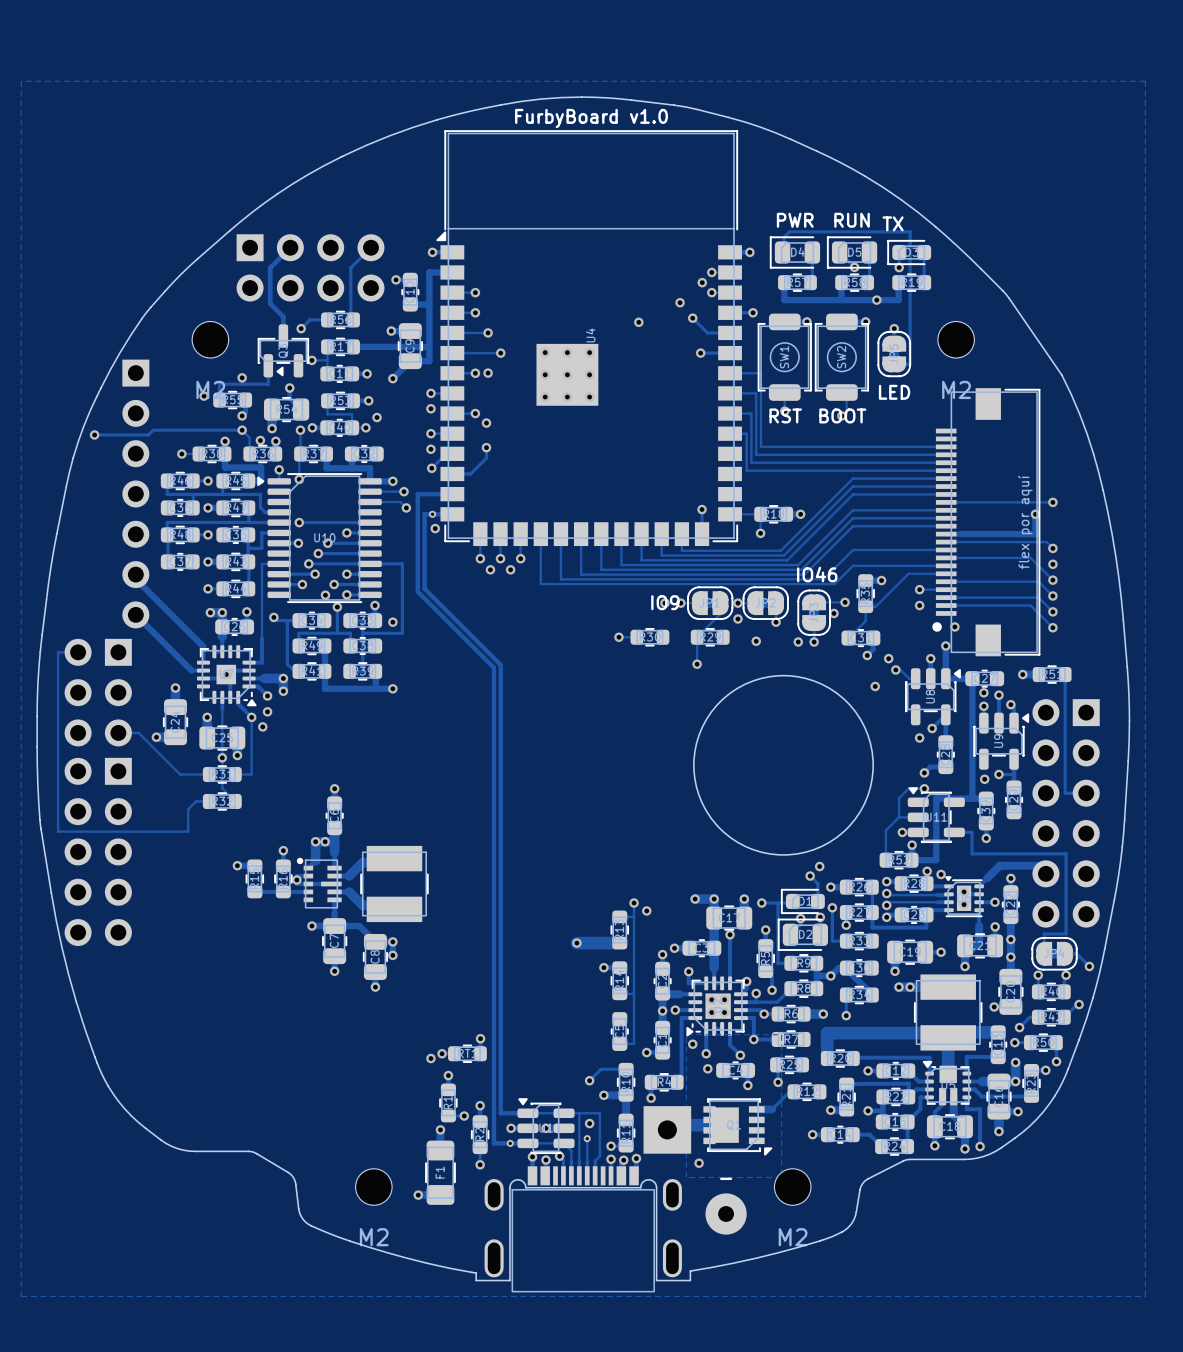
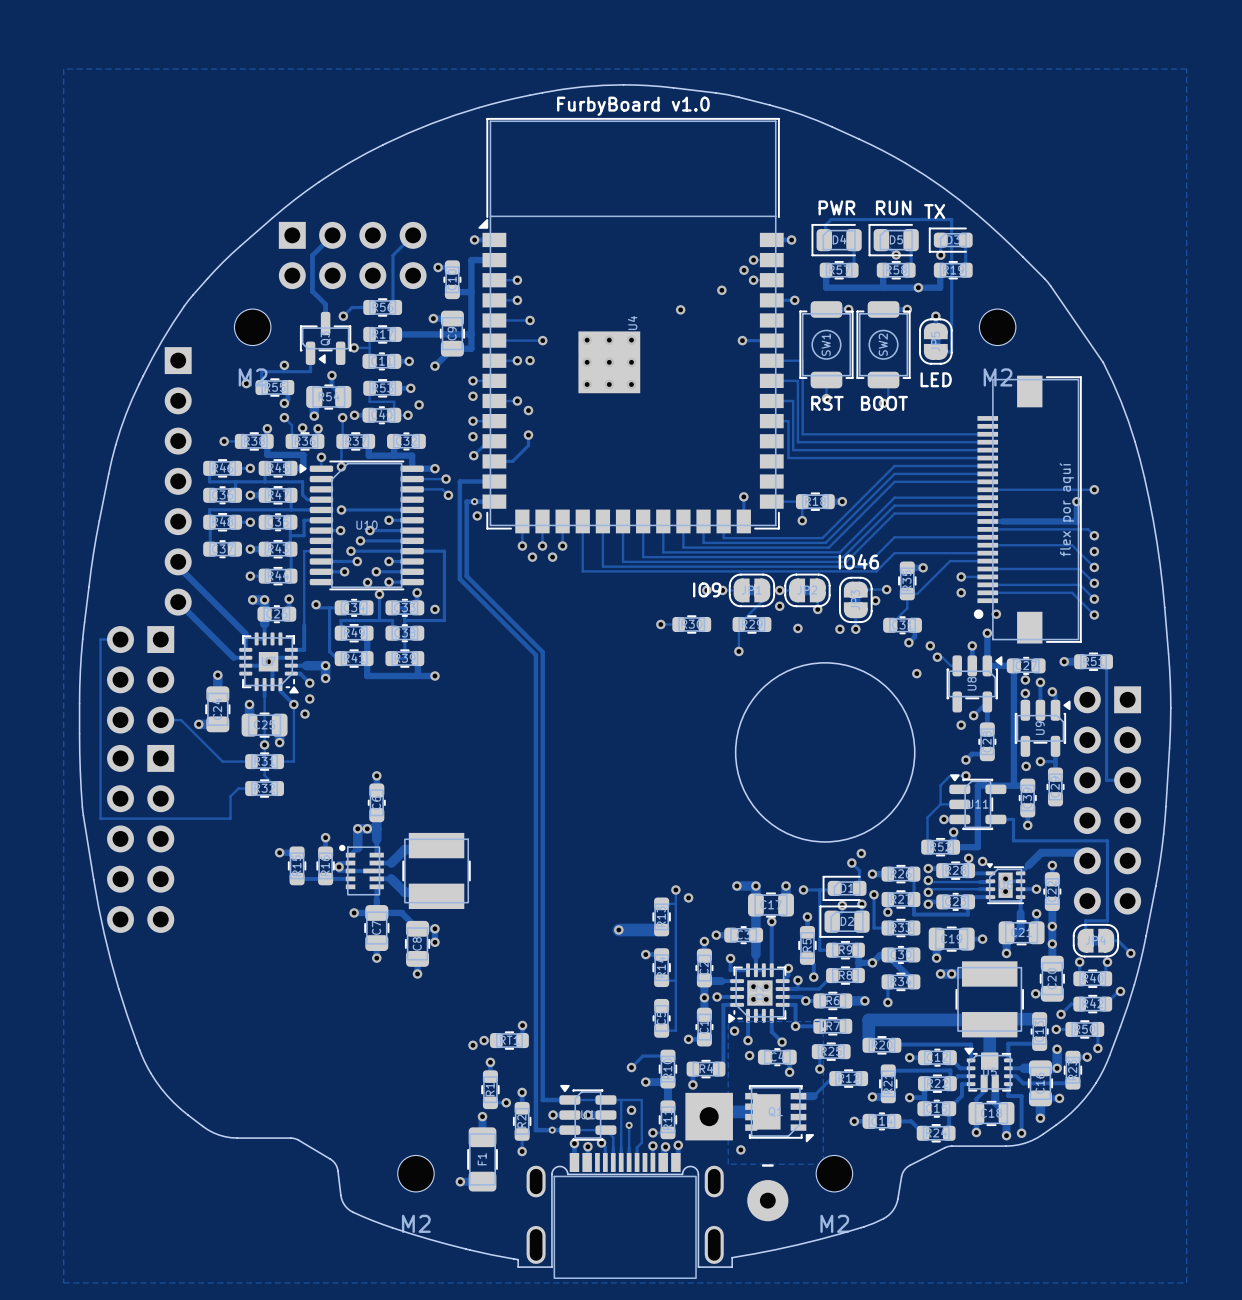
track: (692, 318) (707, 332) (730, 332) -> none
via: (692, 318) -> none
track: (242, 430) (153, 430) (148, 434) (94, 434) -> none
via: (94, 434) -> none

